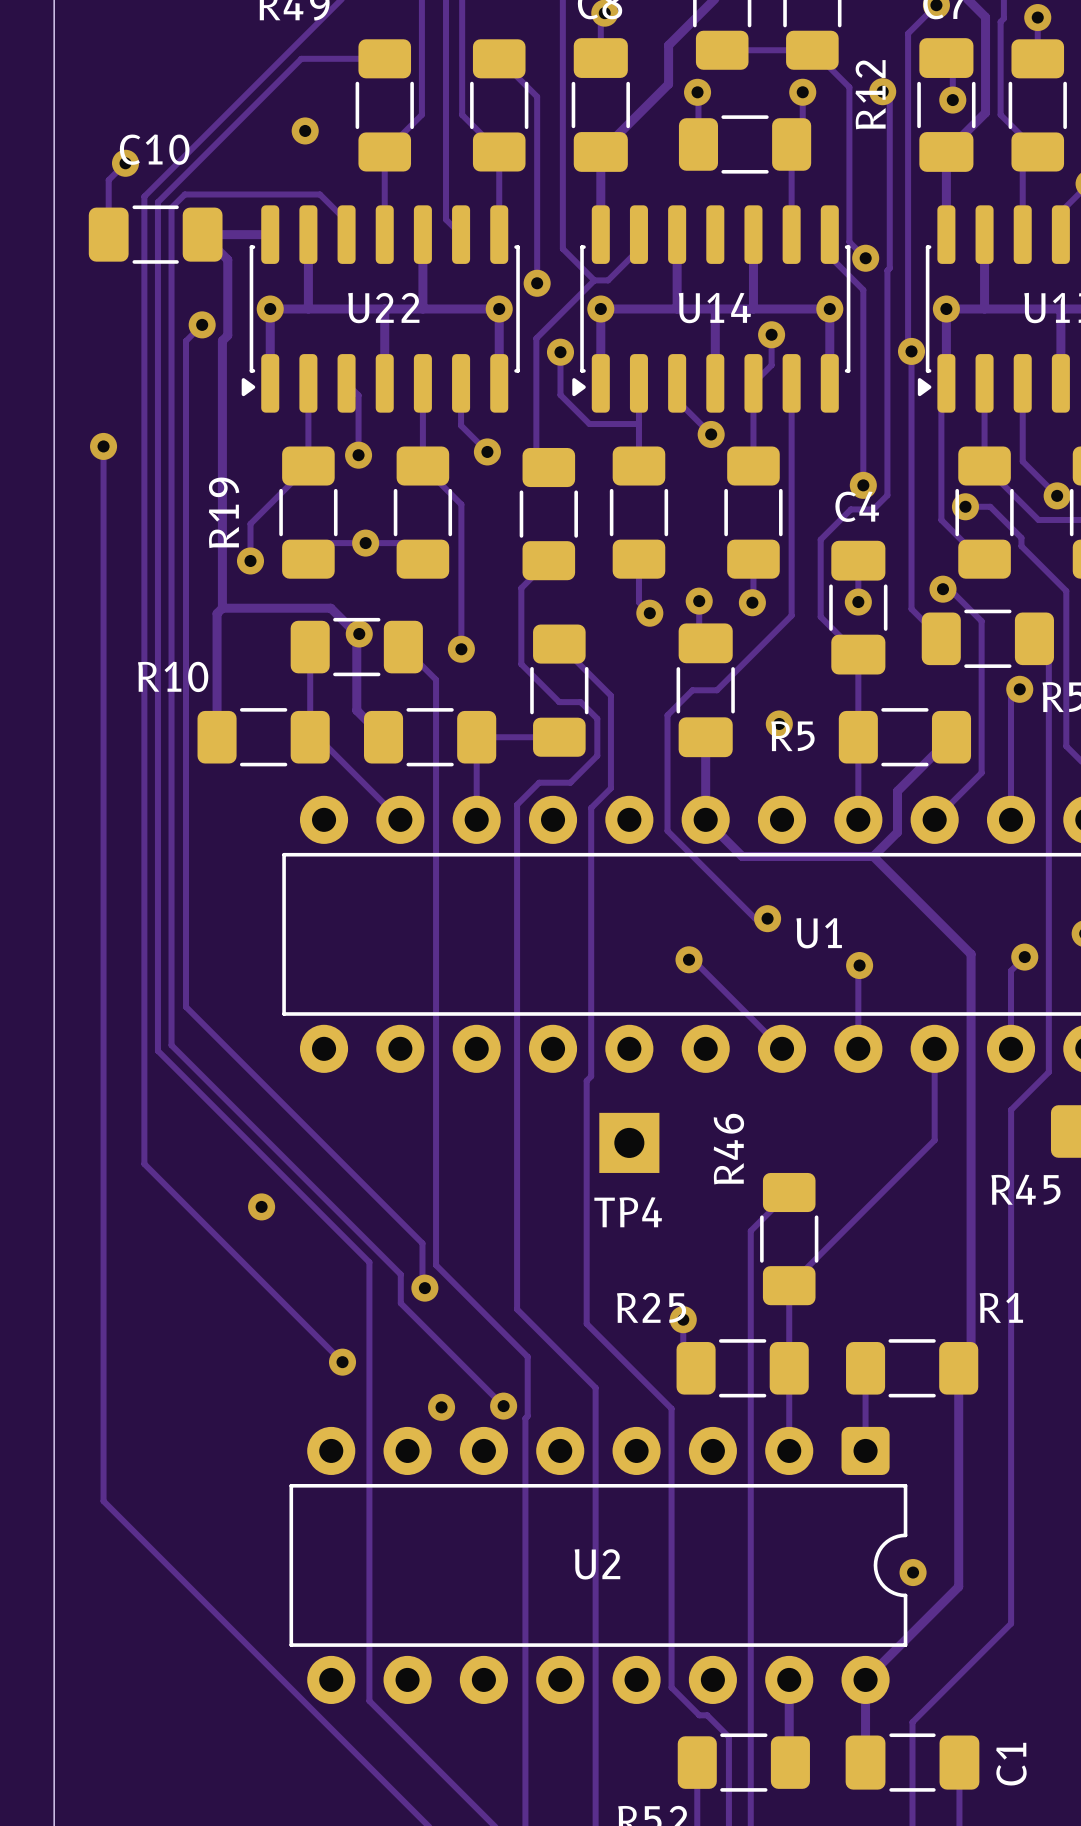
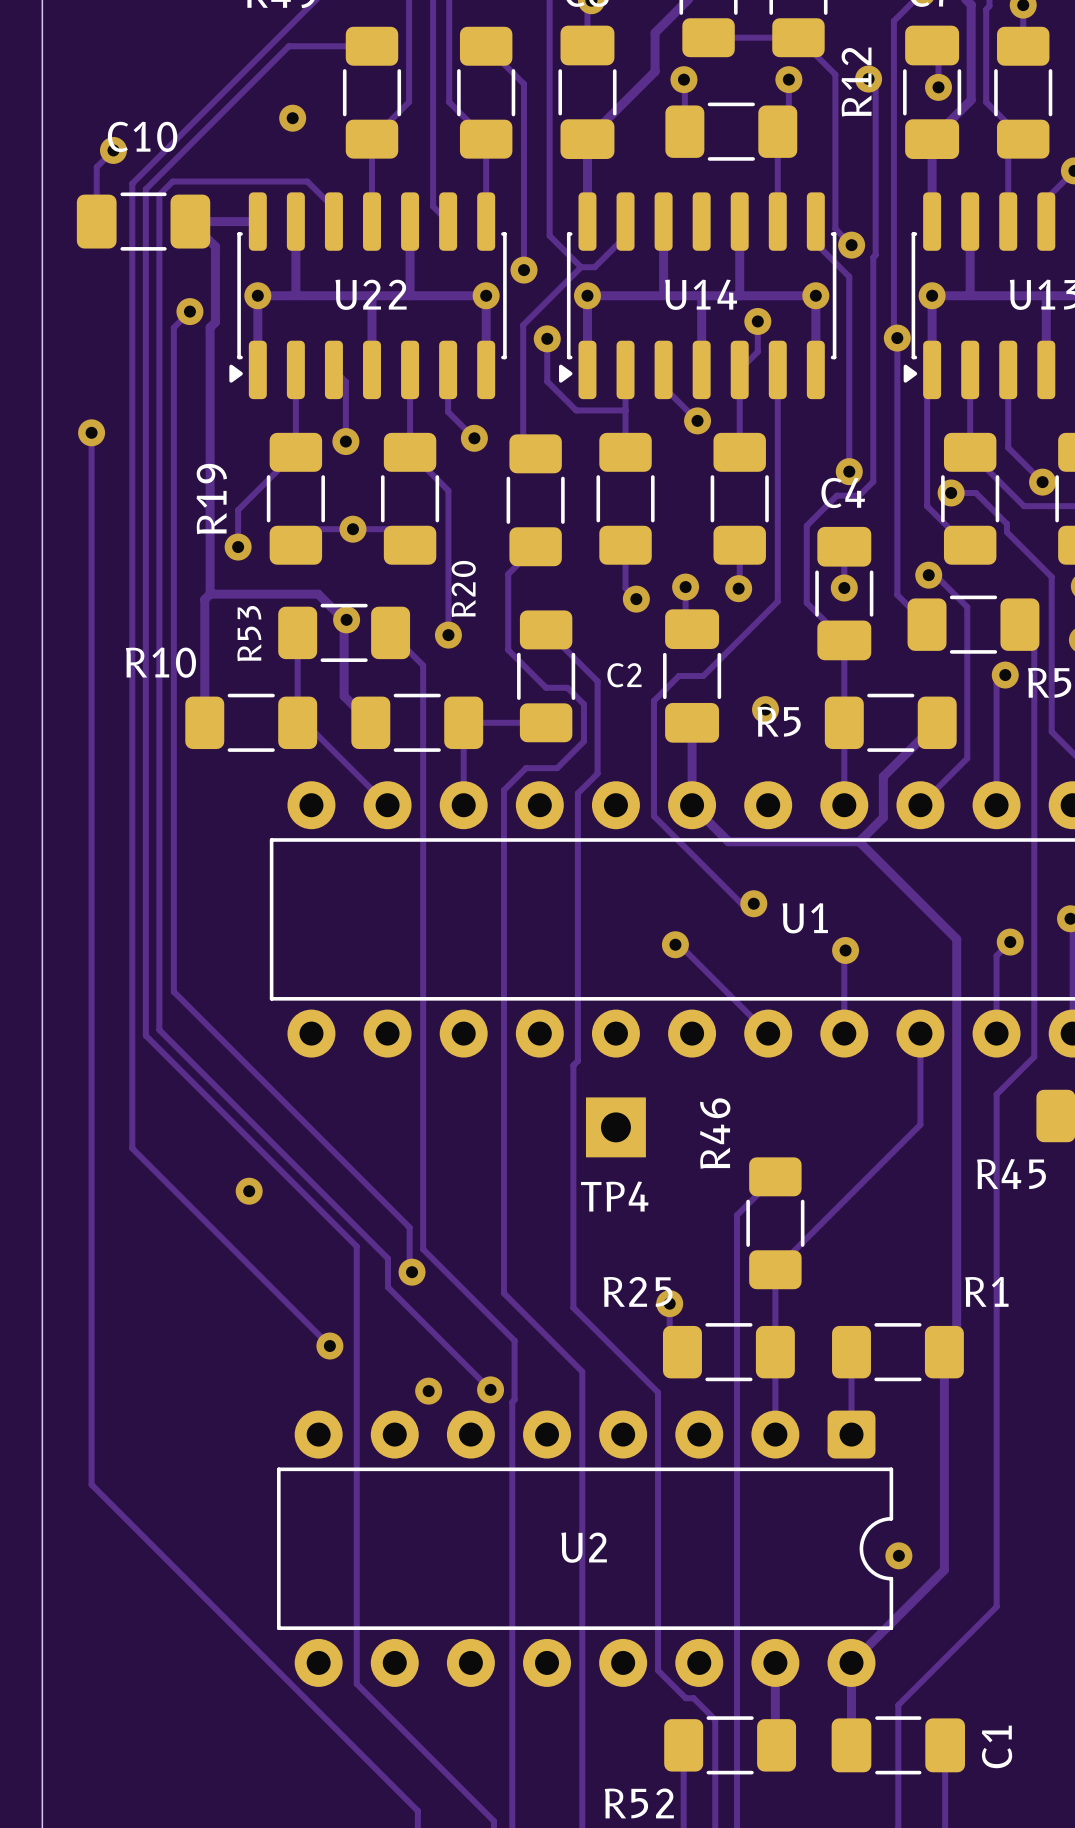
R20 name: none -> R20 (463, 588)
R53 name: none -> R53 (249, 633)
C2 name: none -> C2 (624, 675)

